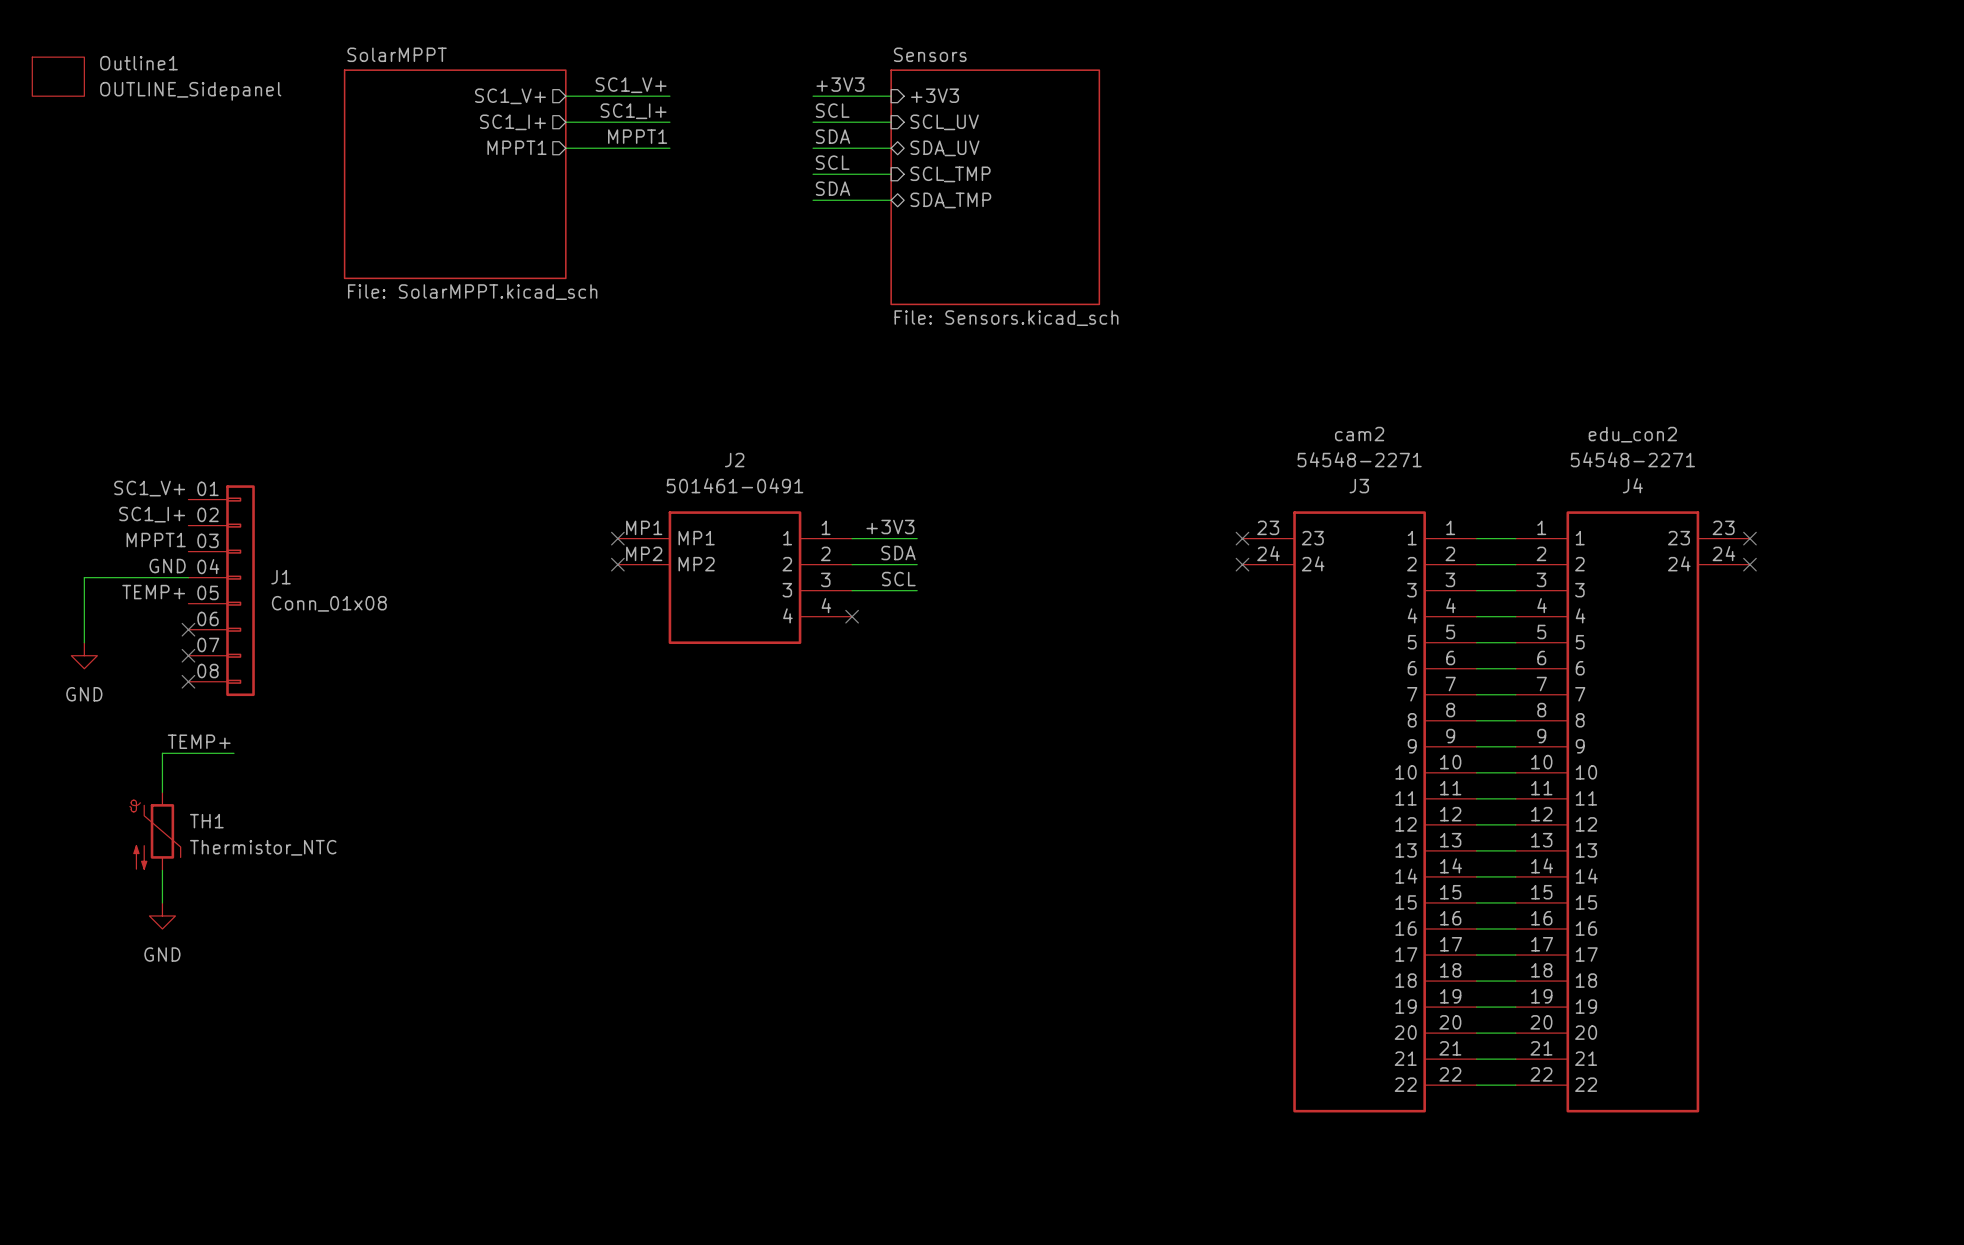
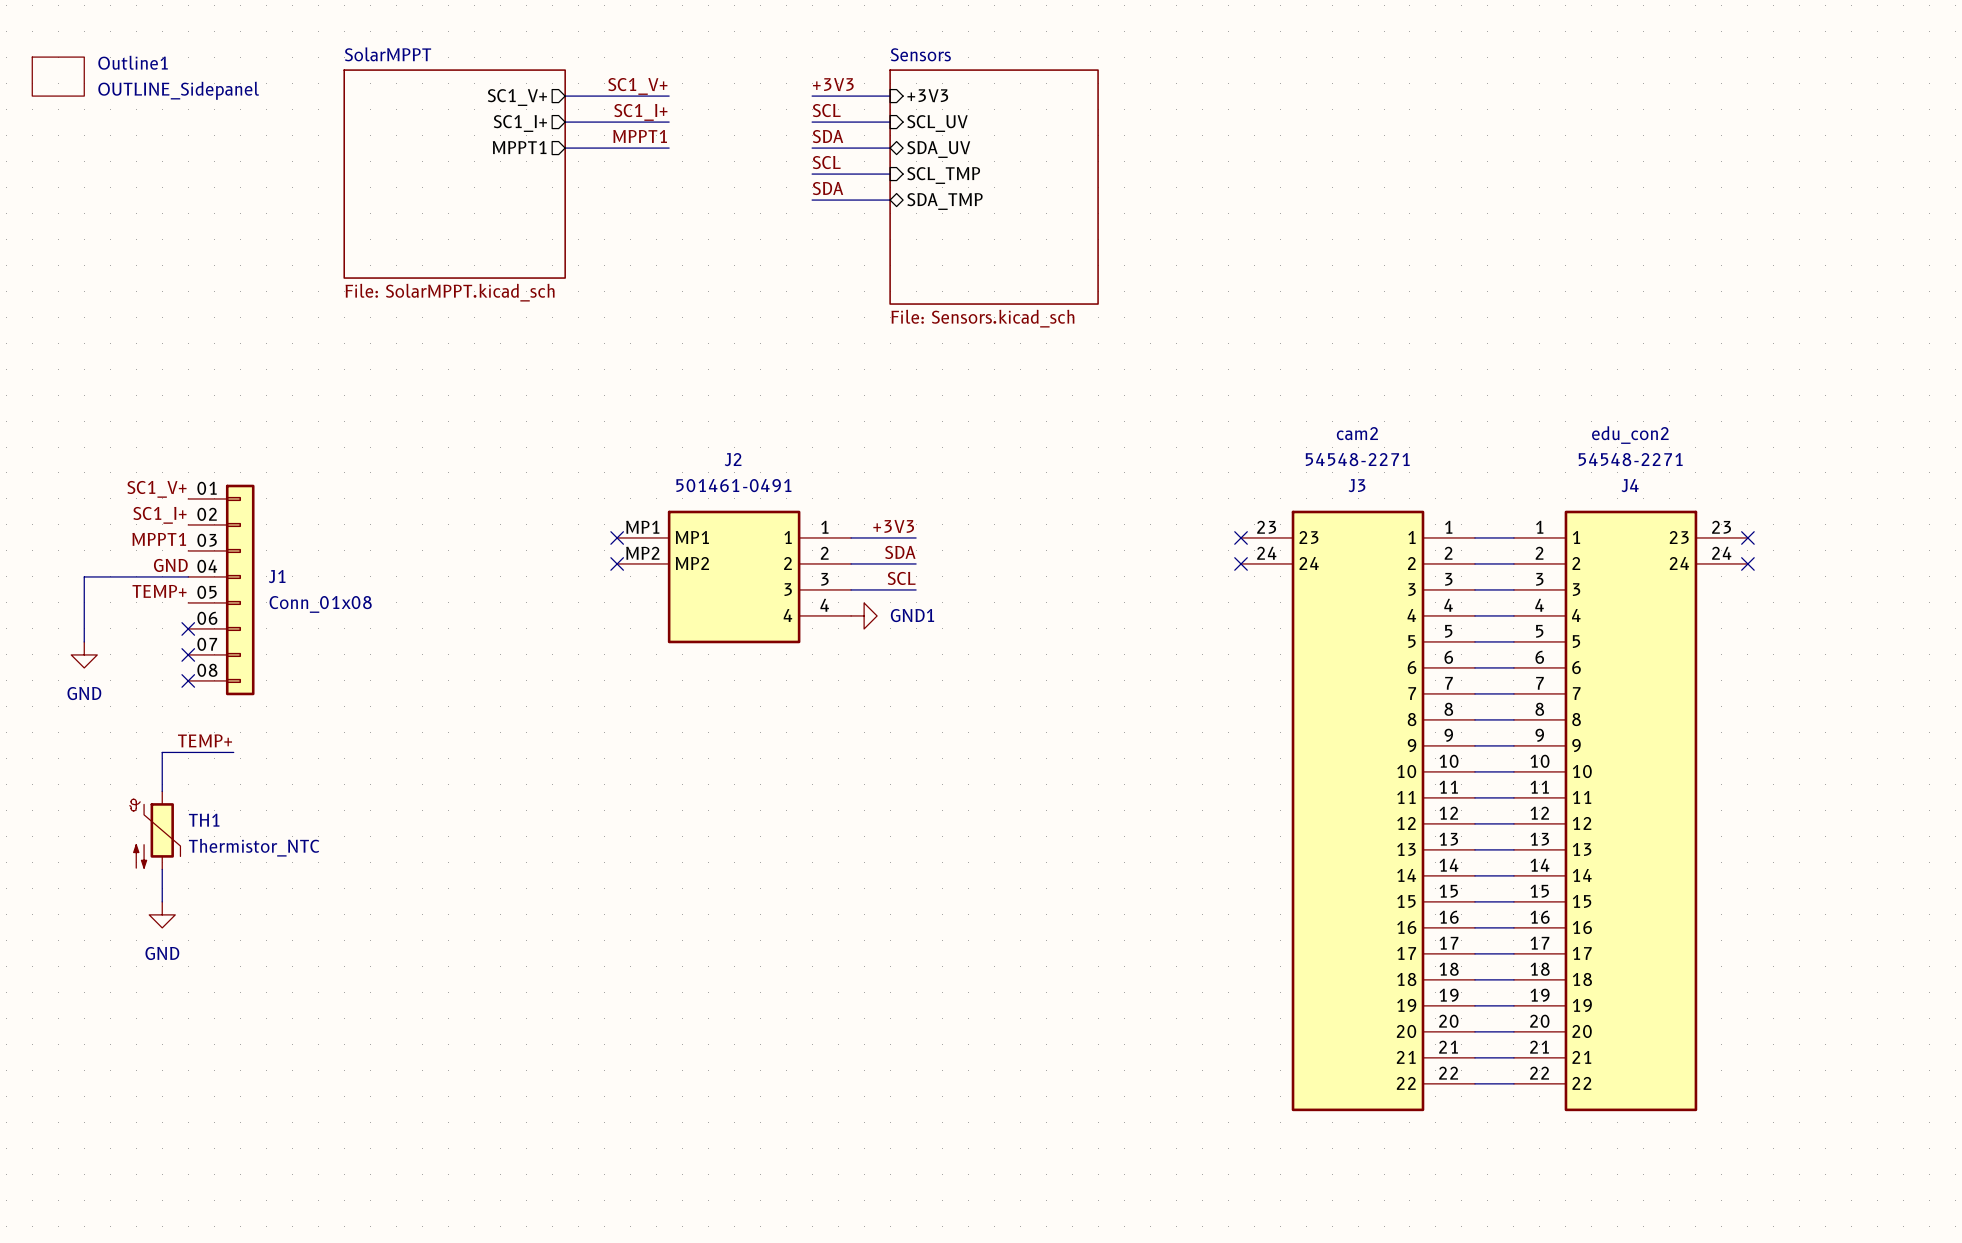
no-connect mark: (852, 616) -> none
power symbol: none -> GND1 (864, 615)

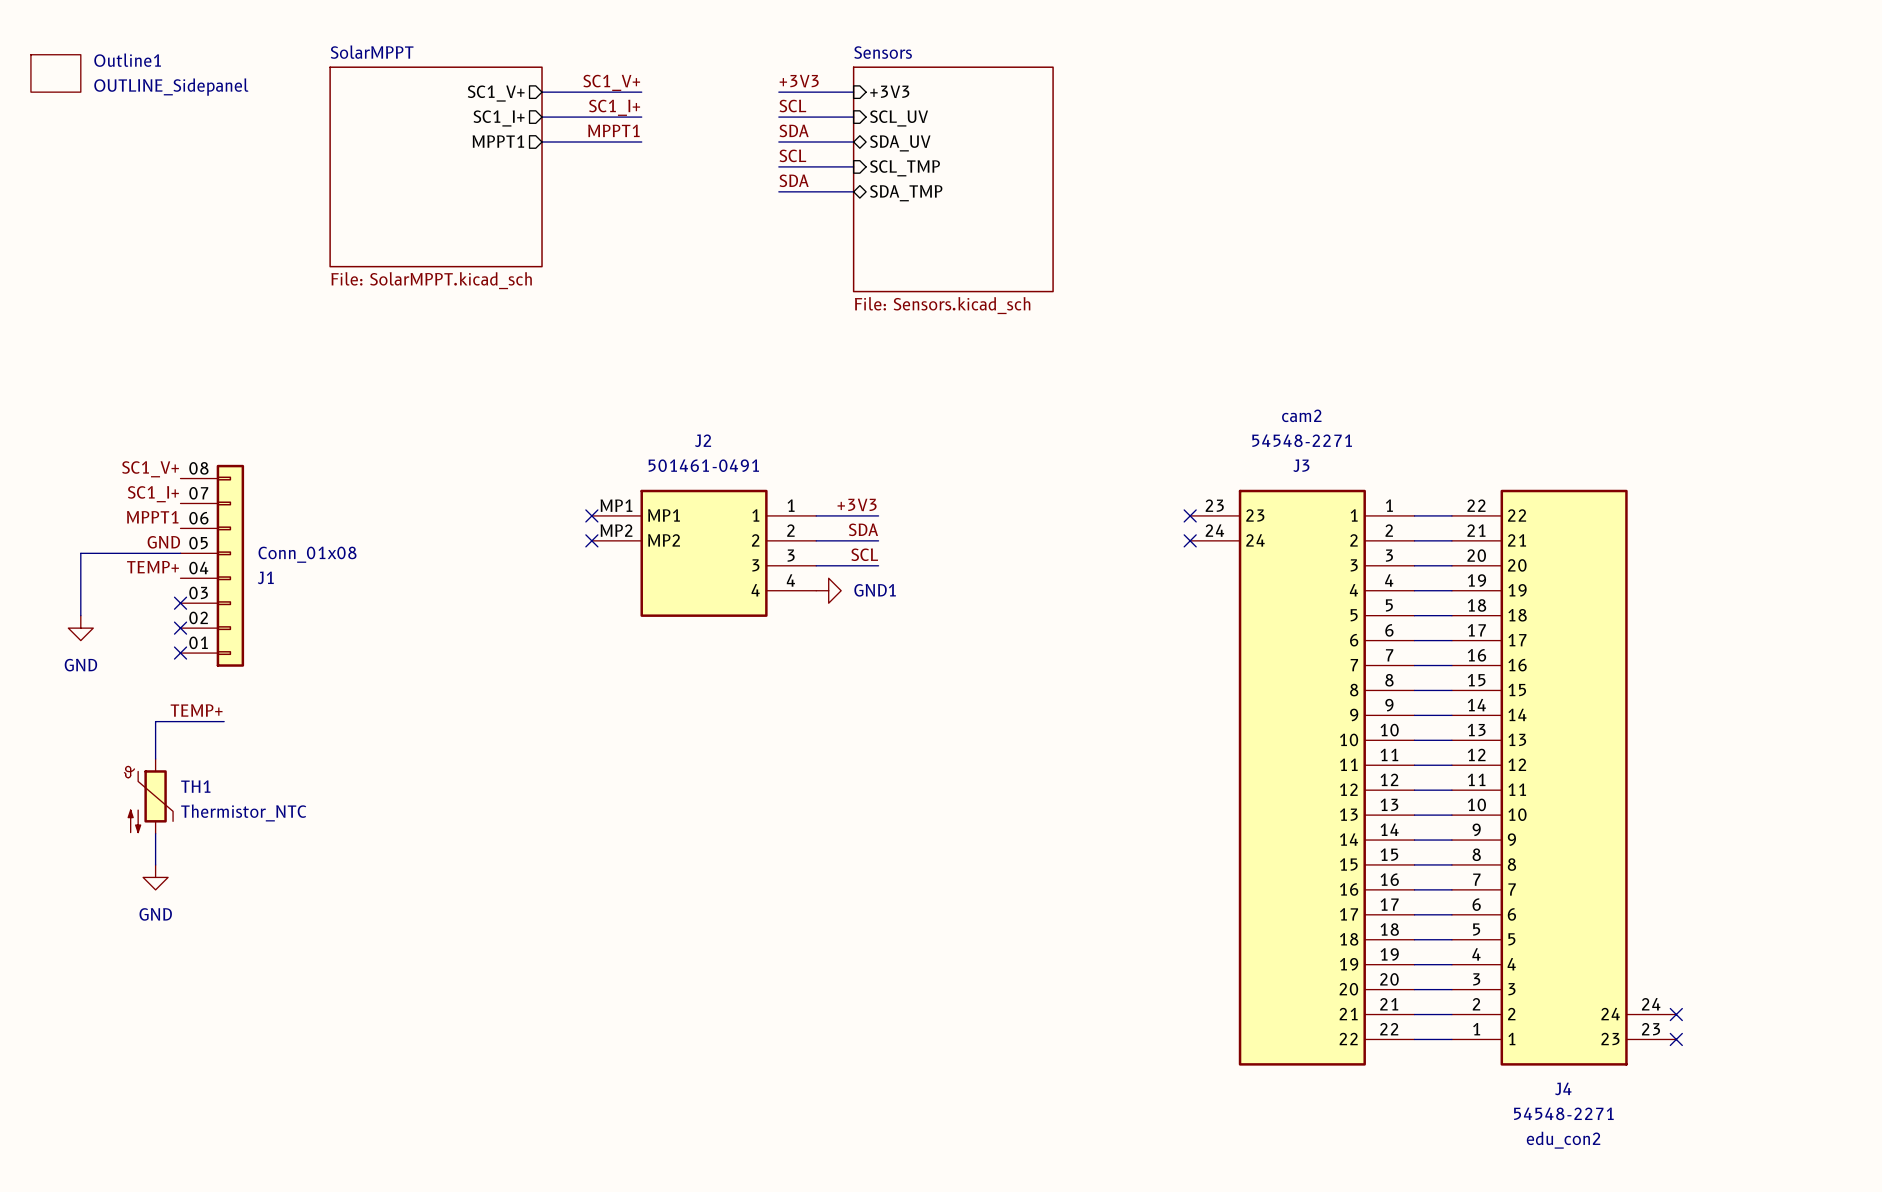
no-connect mark: (1747, 537) -> none
no-connect mark: (1747, 563) -> none
J1 flip: as is (240, 589) -> up-down (230, 565)
edu_con2 flip: as is (1630, 810) -> up-down (1564, 777)
no-connect mark: none -> (1676, 1014)
no-connect mark: none -> (1676, 1039)

